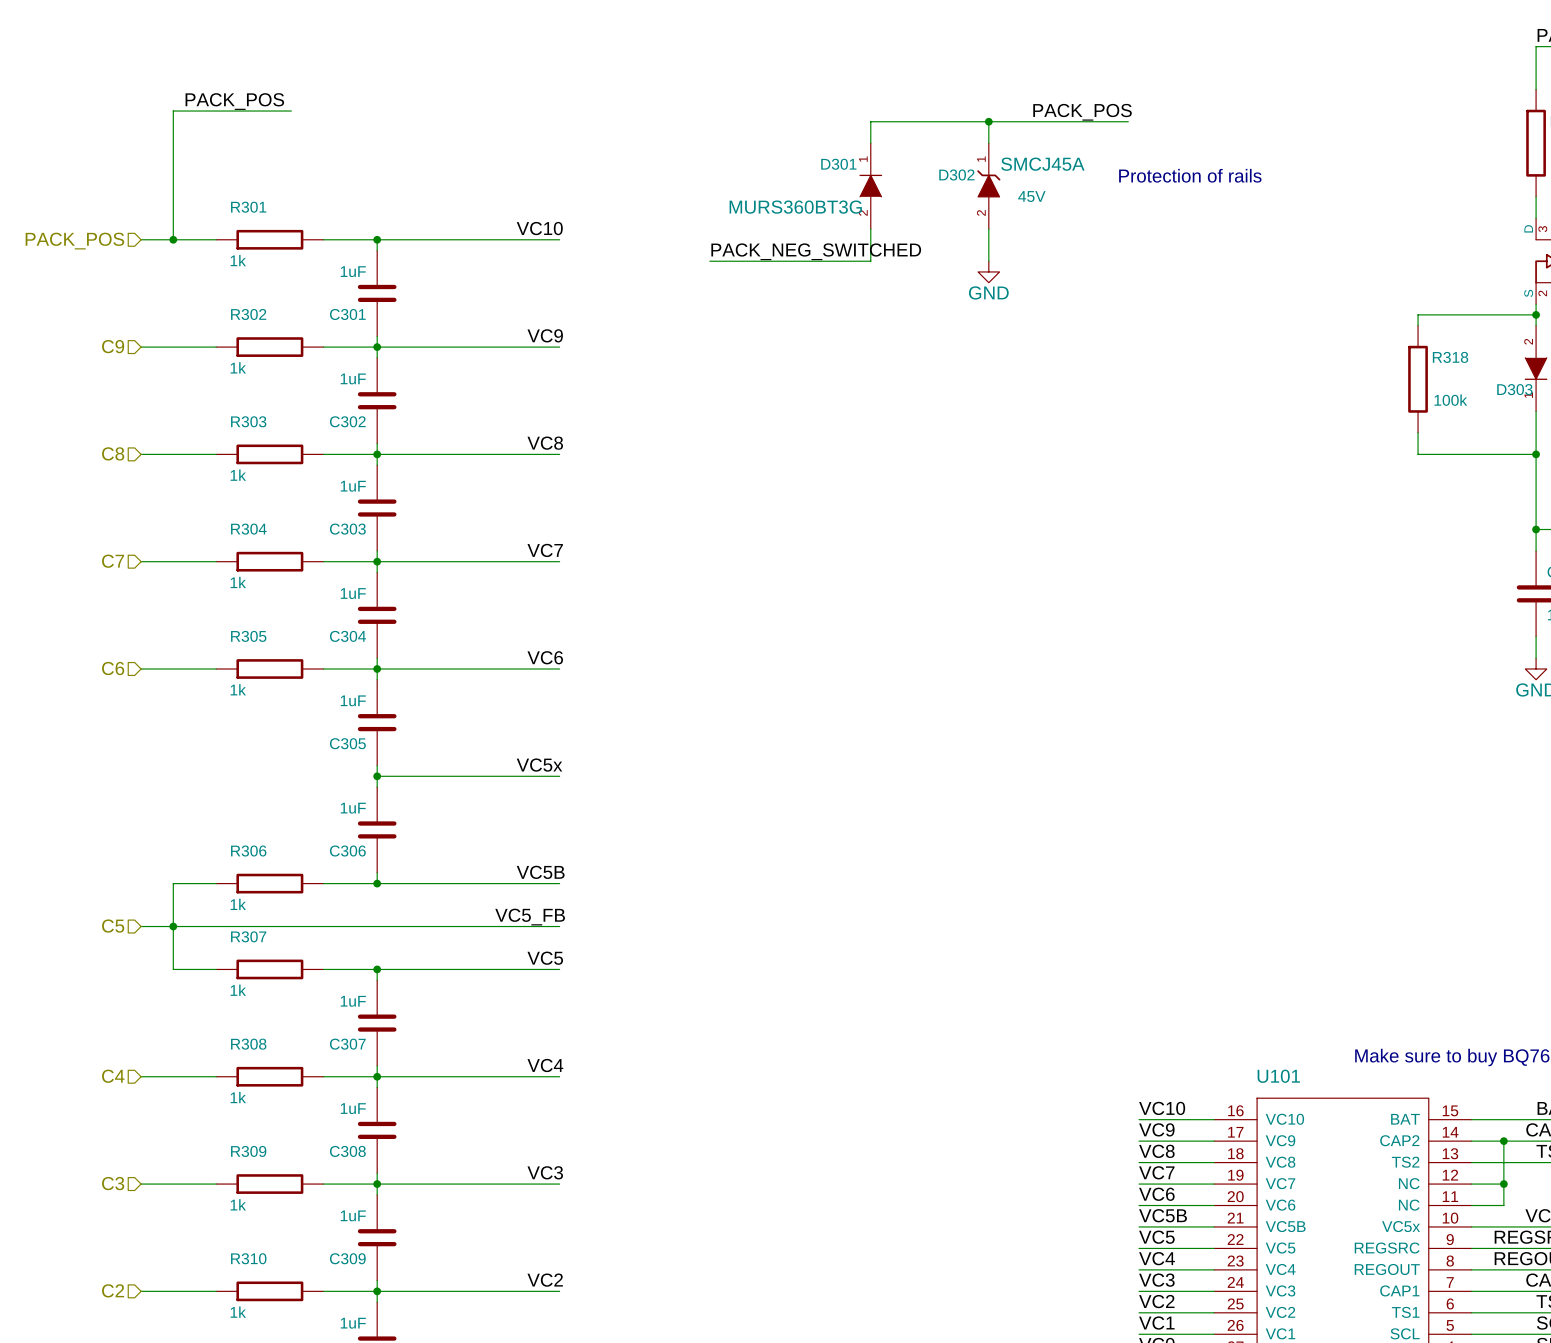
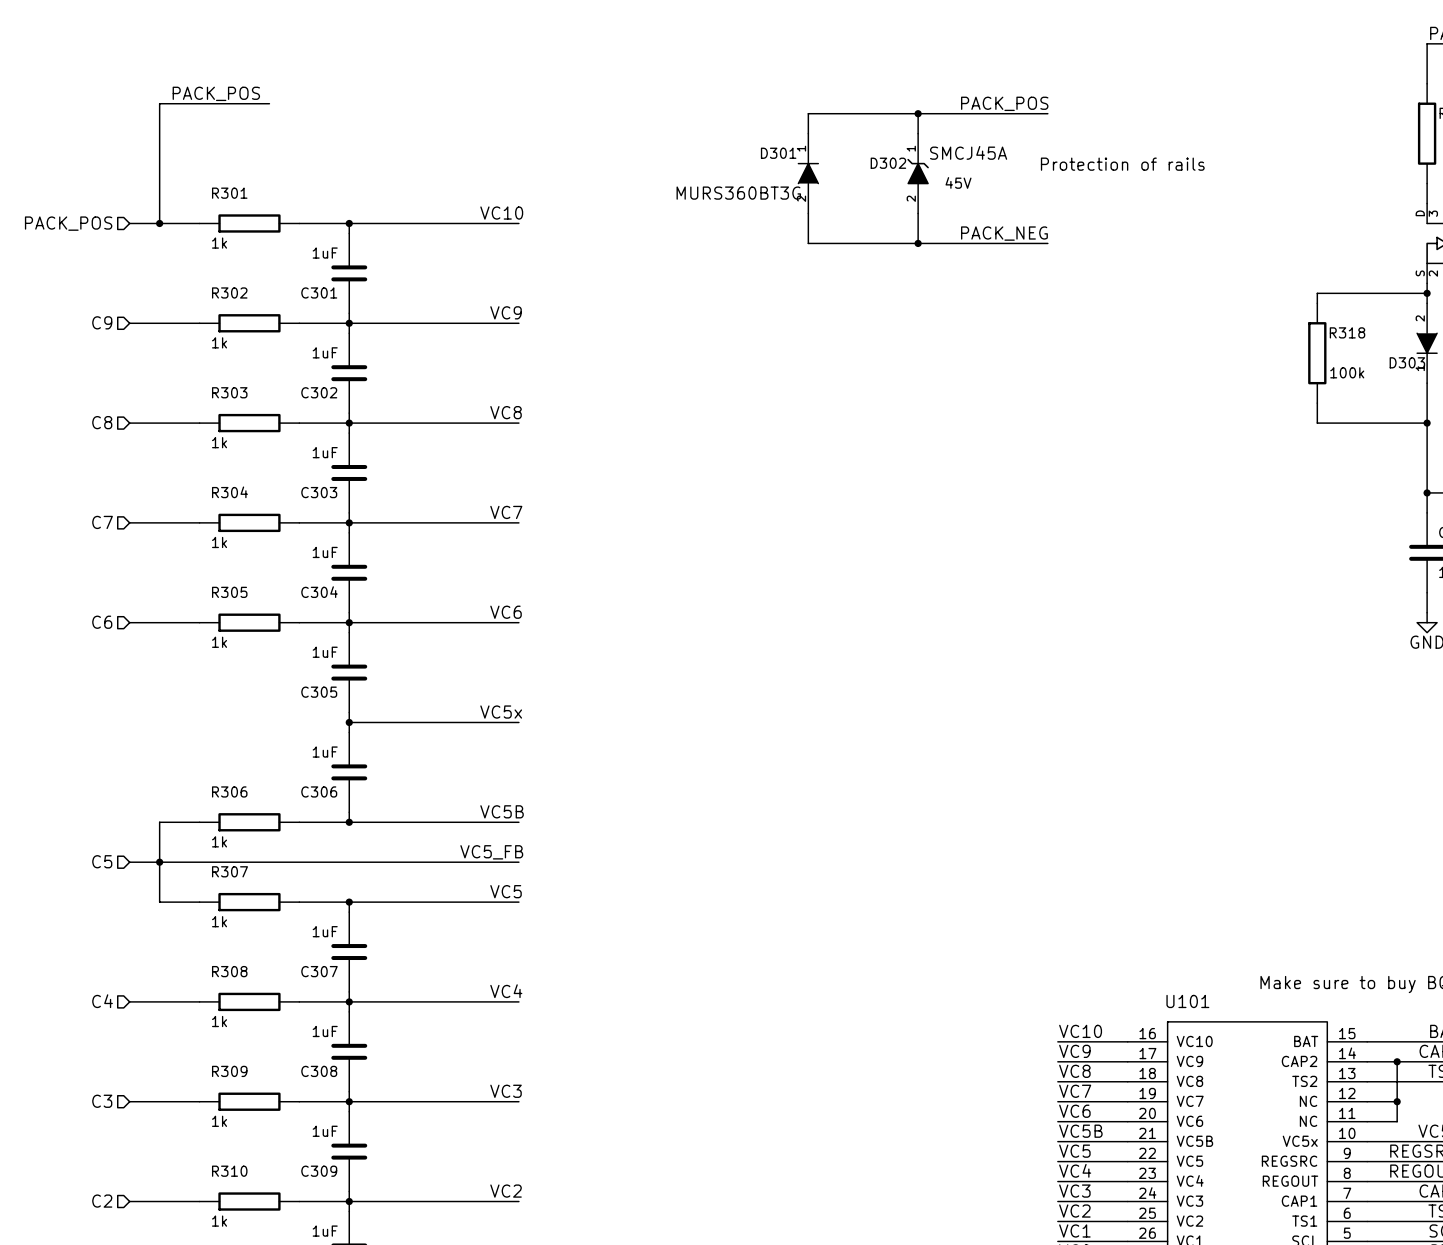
label: PACK_NEG_SWITCHED (816, 251) -> none
label: none -> PACK_NEG (1004, 233)
wire: (709, 261) (870, 261) -> (1047, 243) (808, 243)
junction: none -> (918, 243)
power symbol: GND (988, 271) -> none

